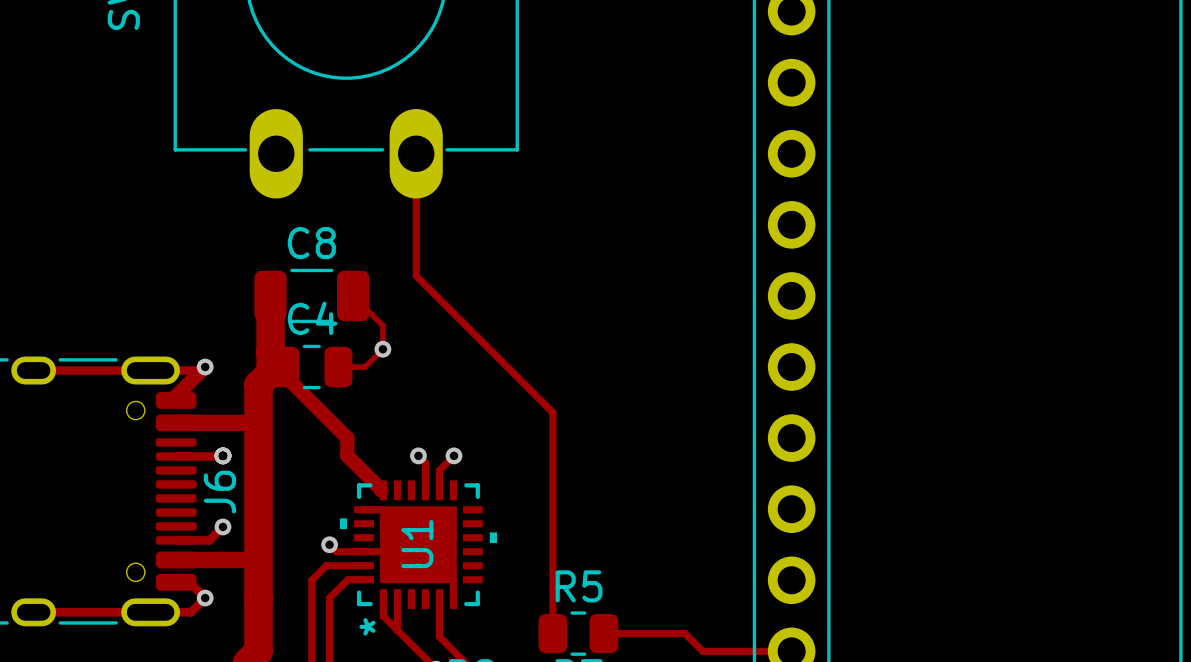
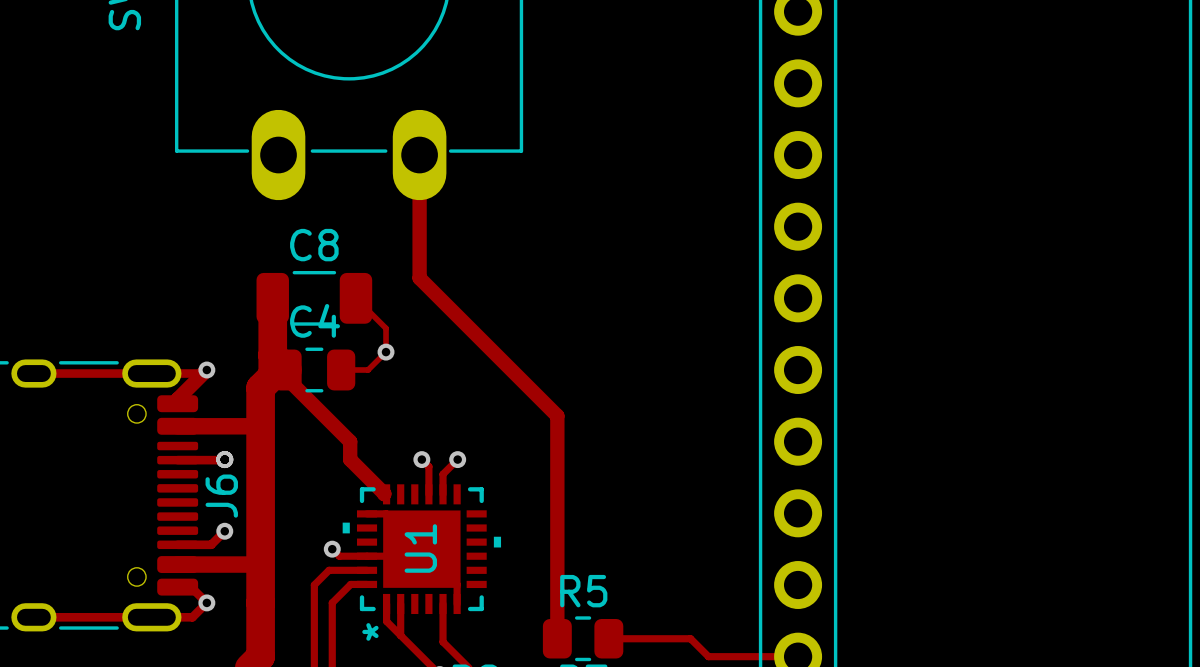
track width: thin (416, 153) (416, 275) (552, 412) (552, 633) -> thick (419, 155) (419, 278) (557, 415) (557, 638)

